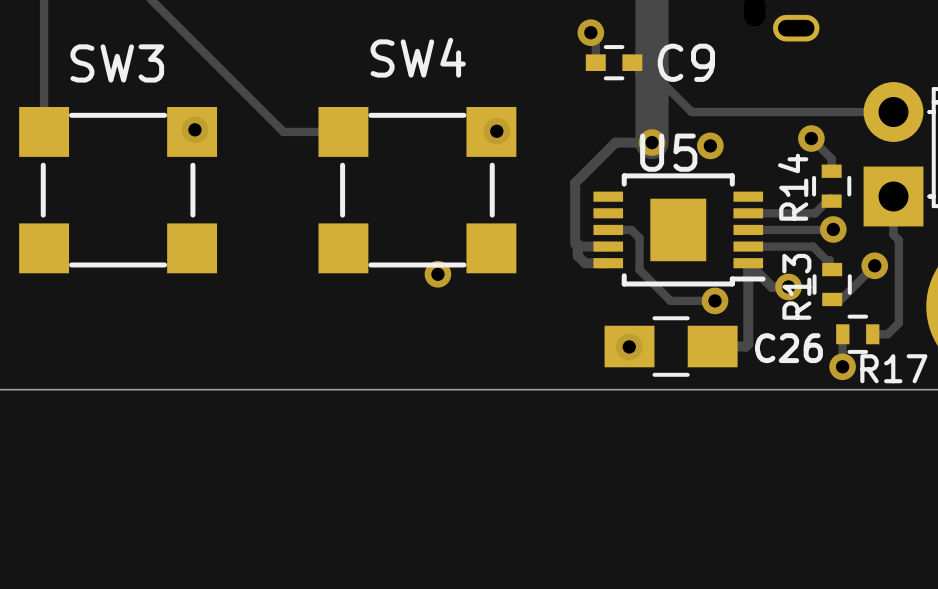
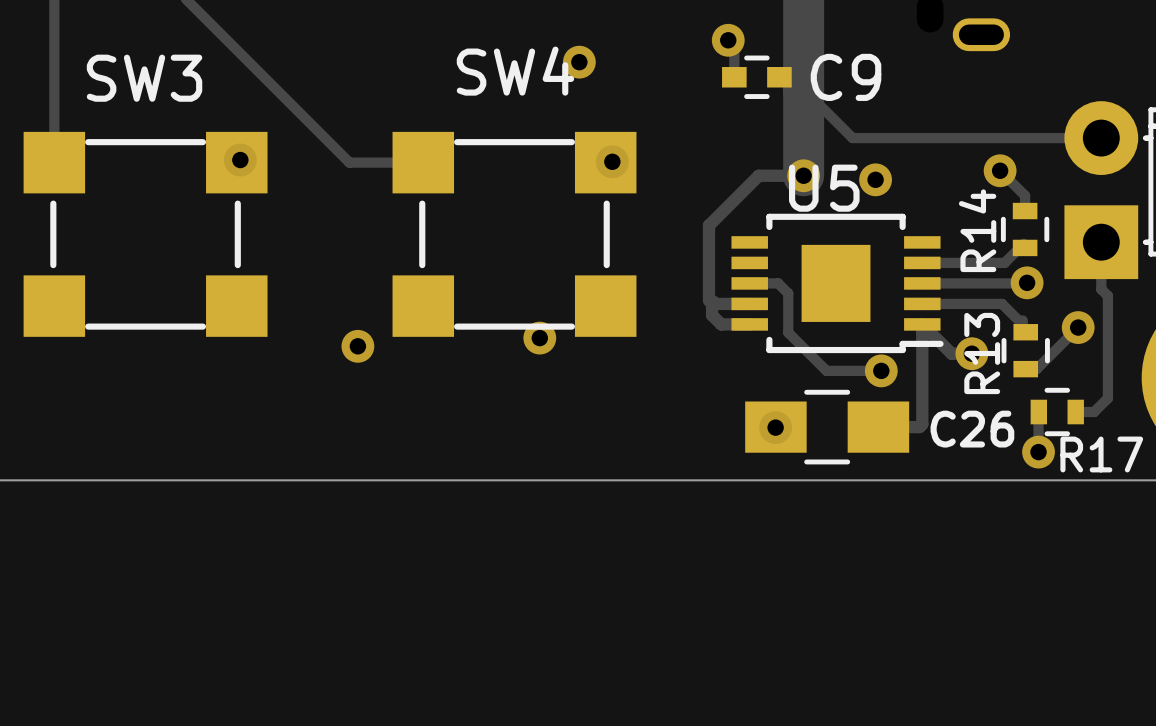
via: none -> (579, 62)
via: none -> (357, 346)

